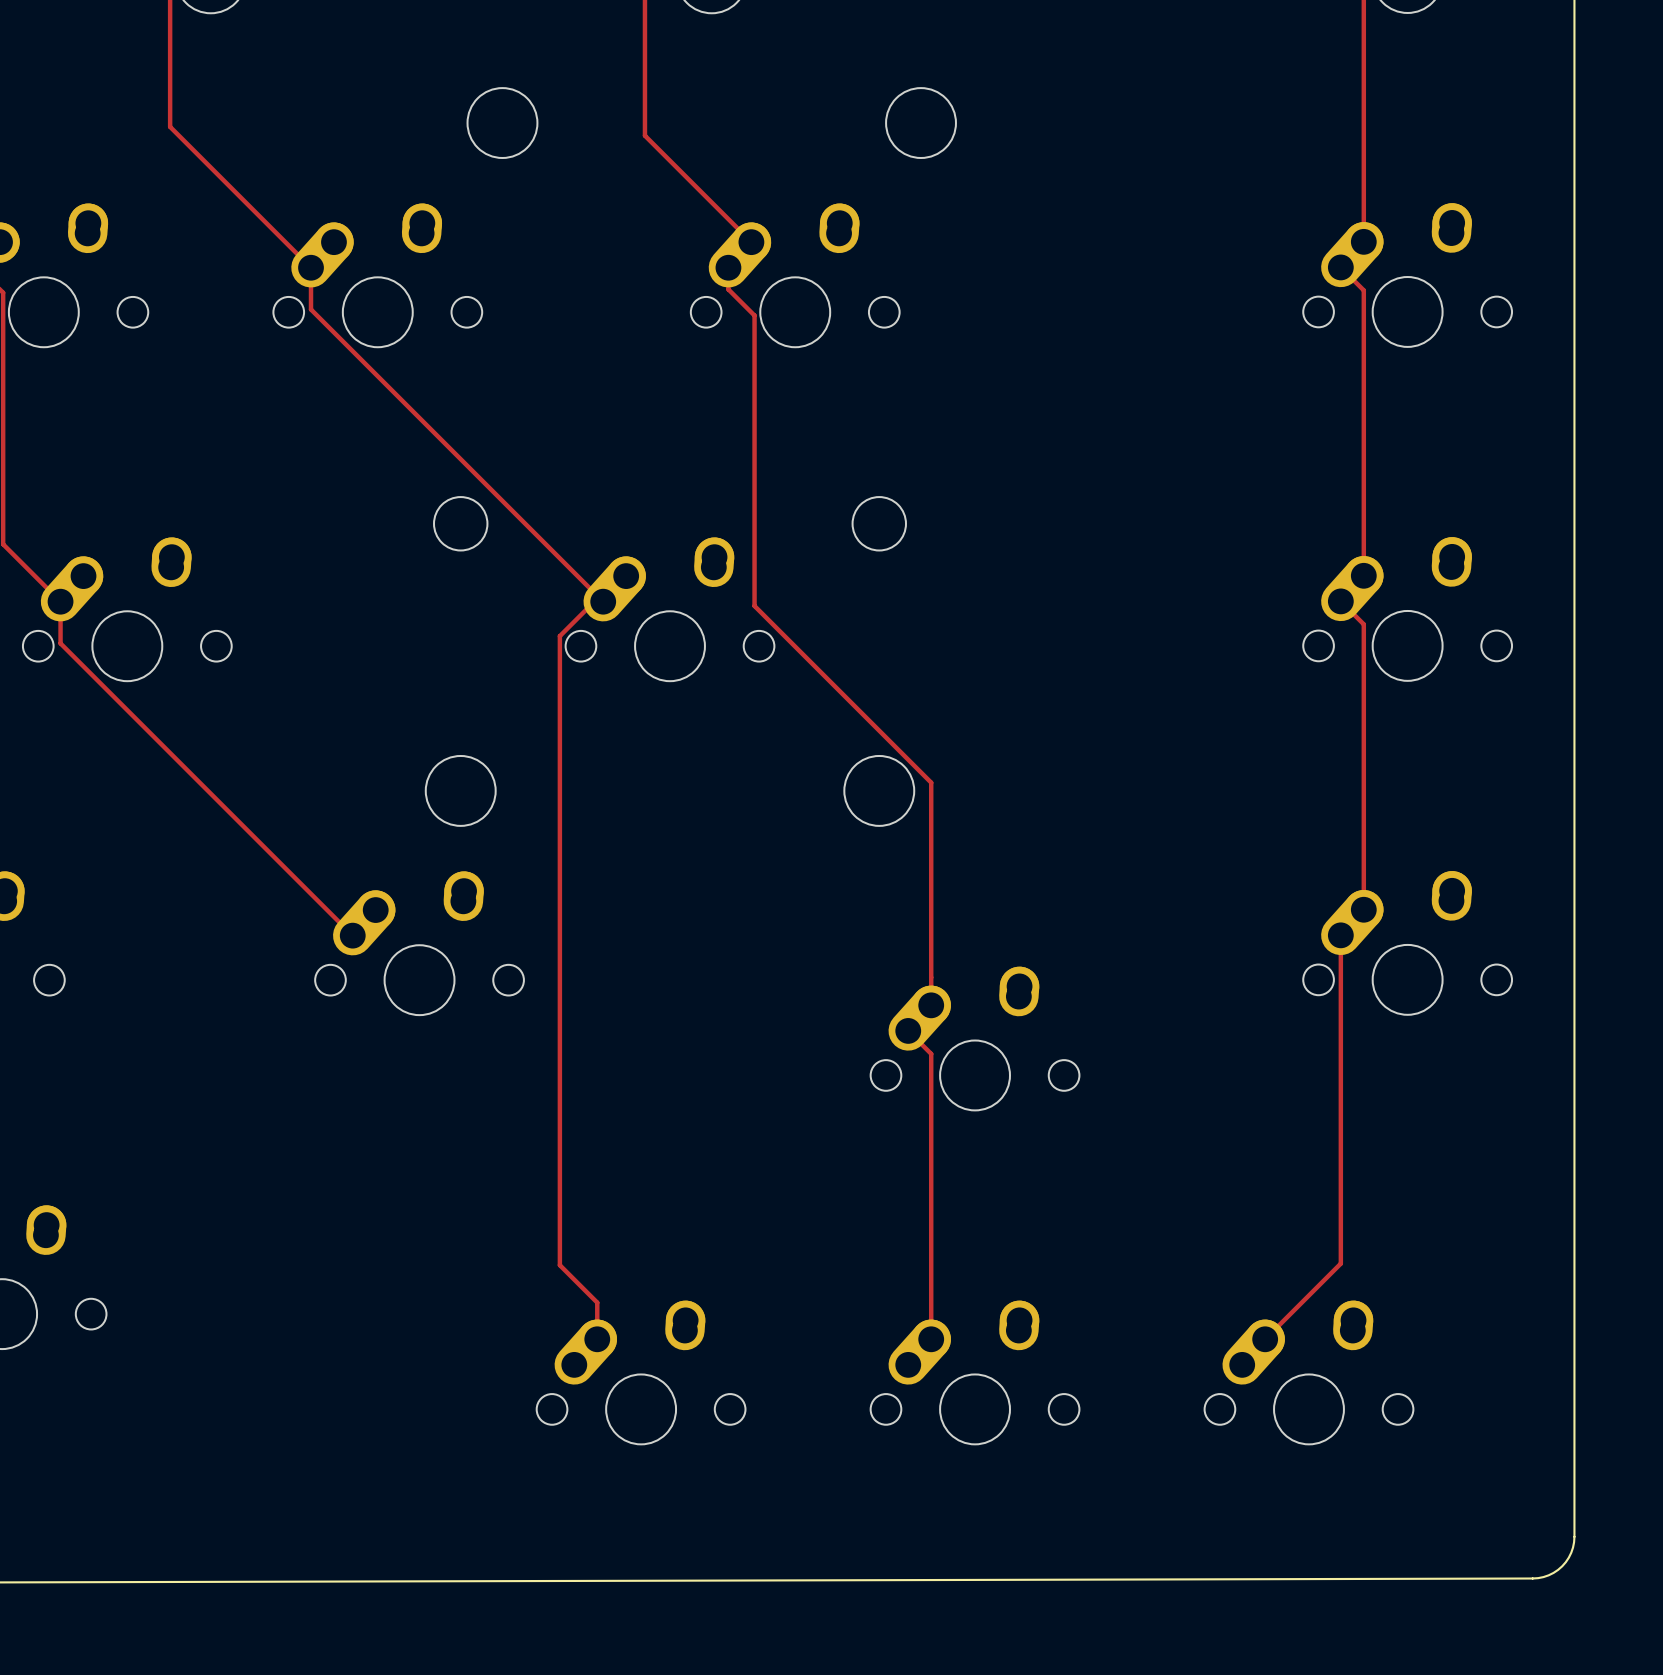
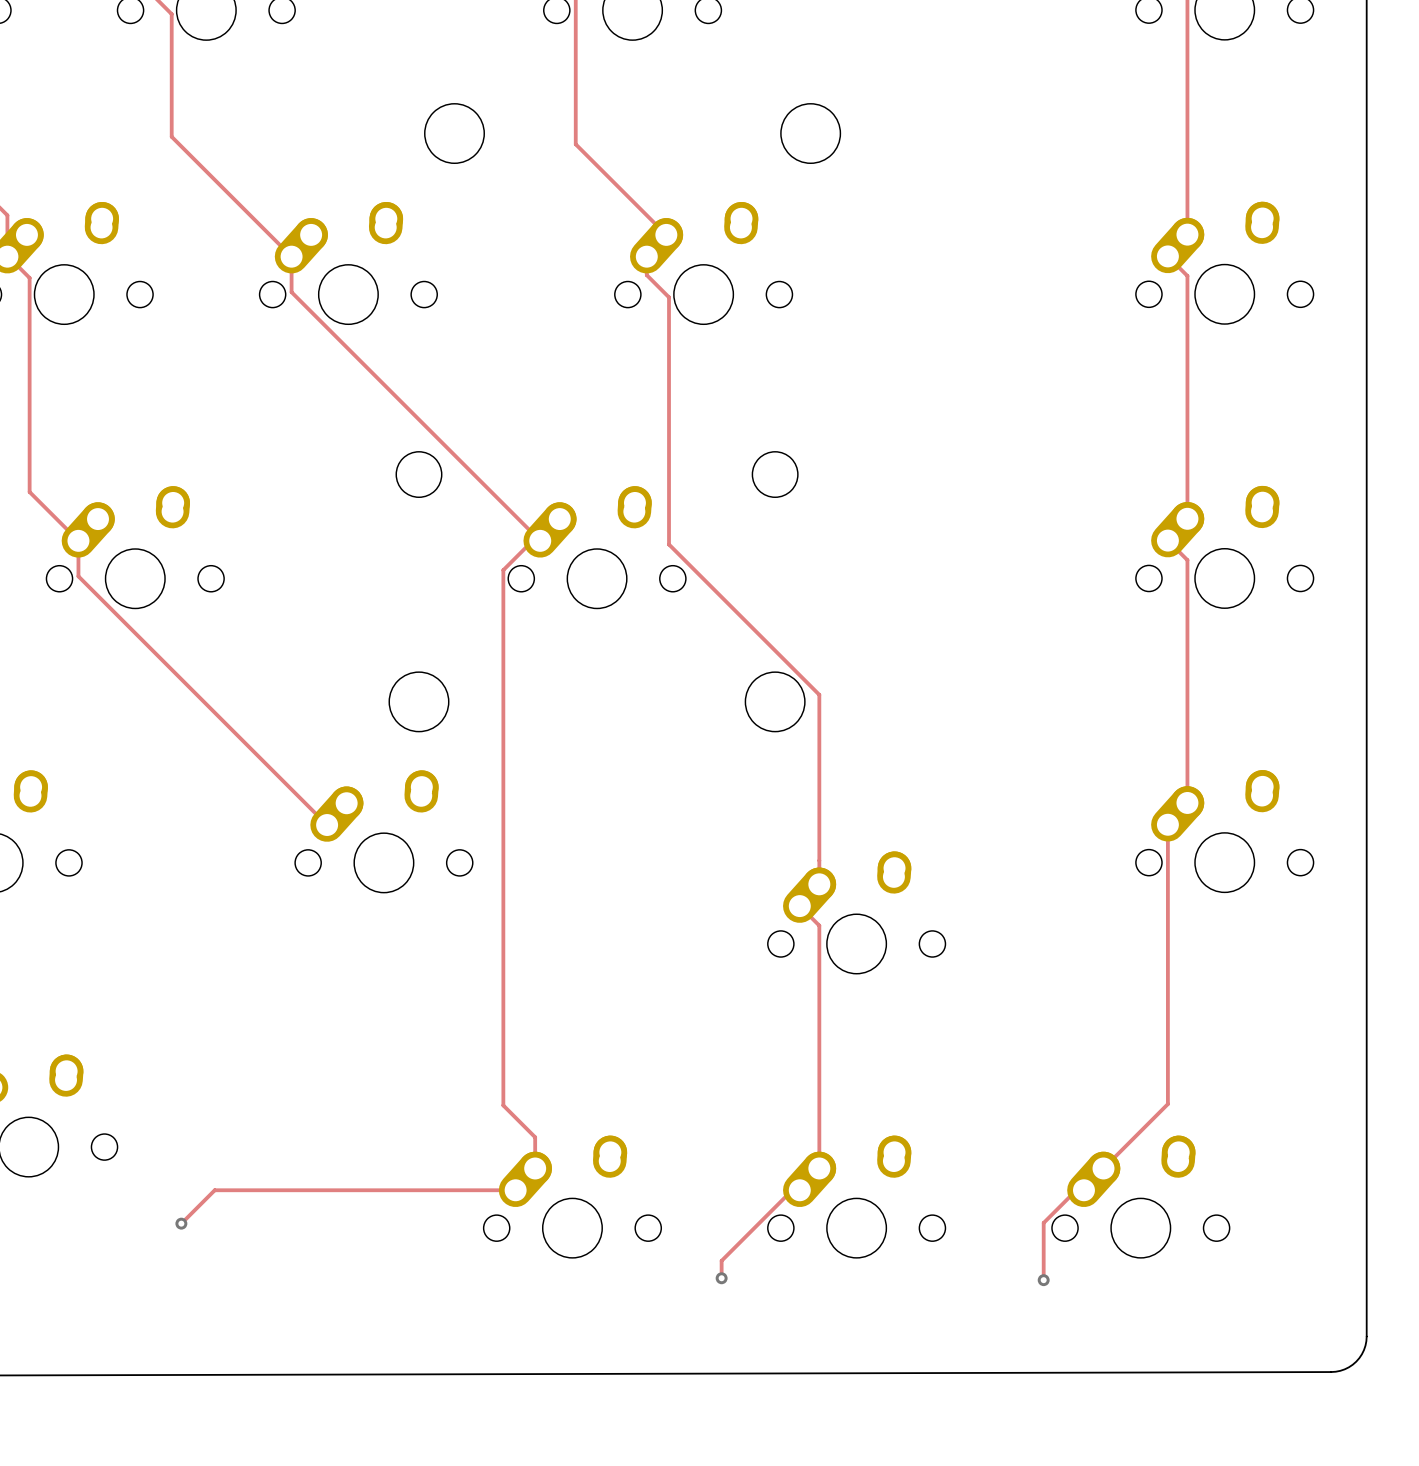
track: none -> (515, 1190) (214, 1190) (181, 1223)
track: none -> (799, 1190) (792, 1190) (721, 1260) (721, 1278)
track: none -> (1083, 1190) (1076, 1190) (1043, 1222) (1043, 1280)
via: none -> (181, 1223)
via: none -> (721, 1278)
via: none -> (1043, 1280)

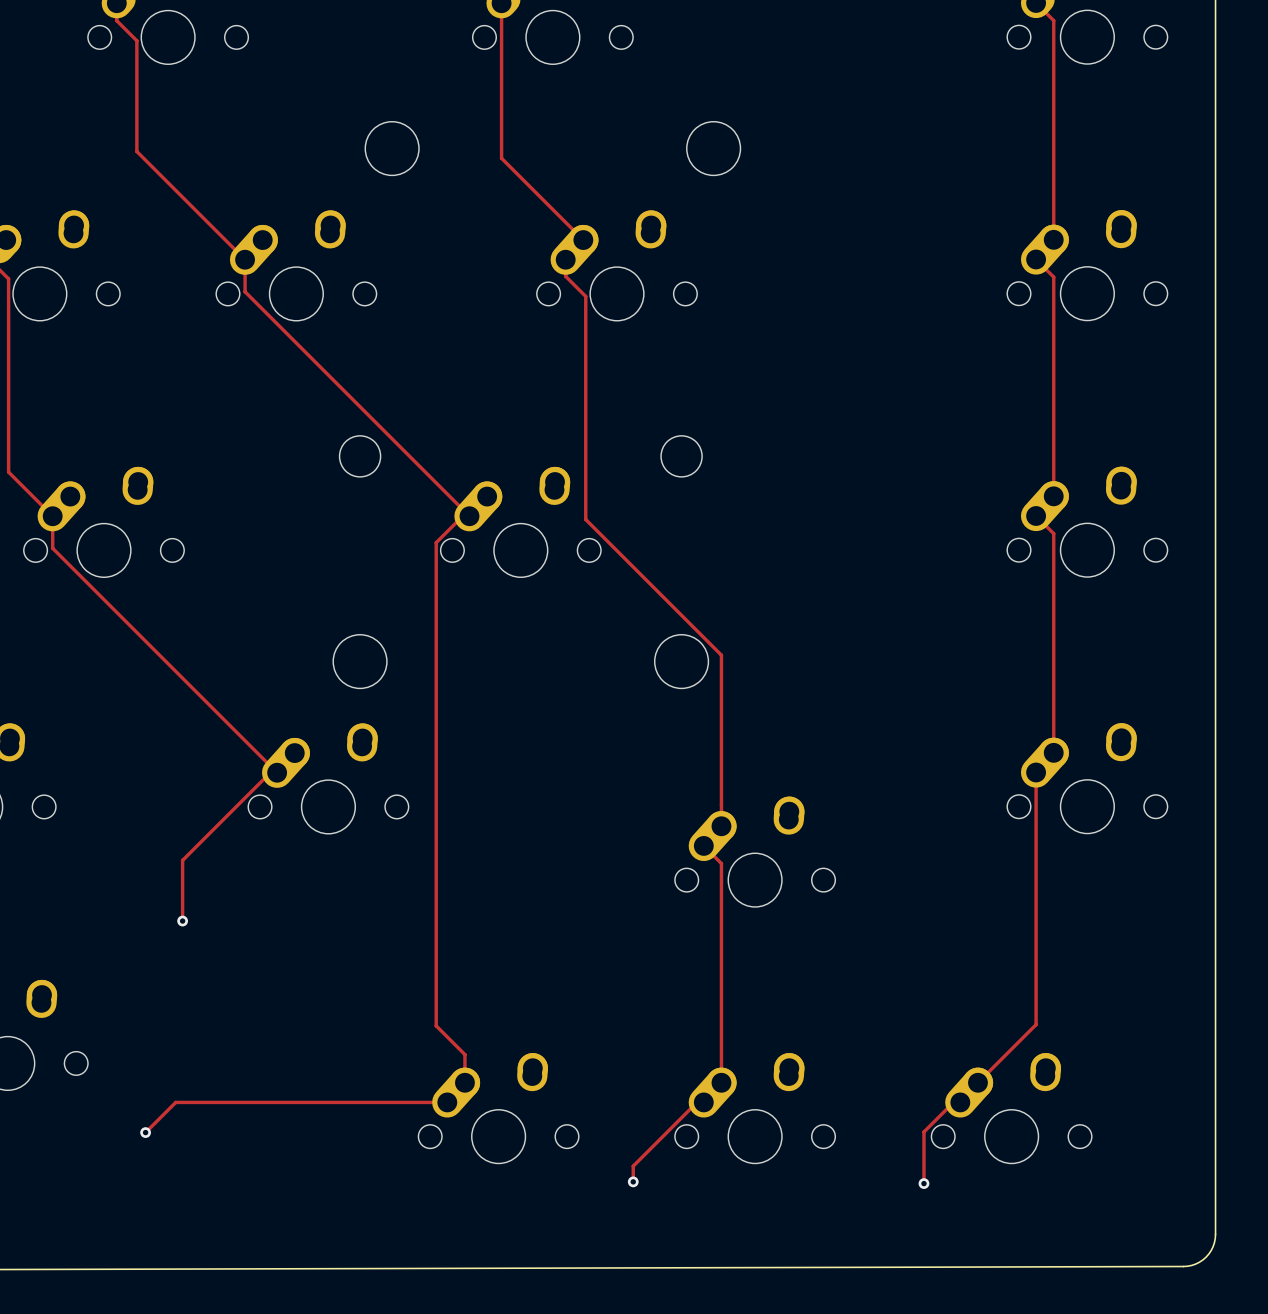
track: none -> (277, 772) (270, 772) (182, 860) (182, 921)
via: none -> (182, 921)

